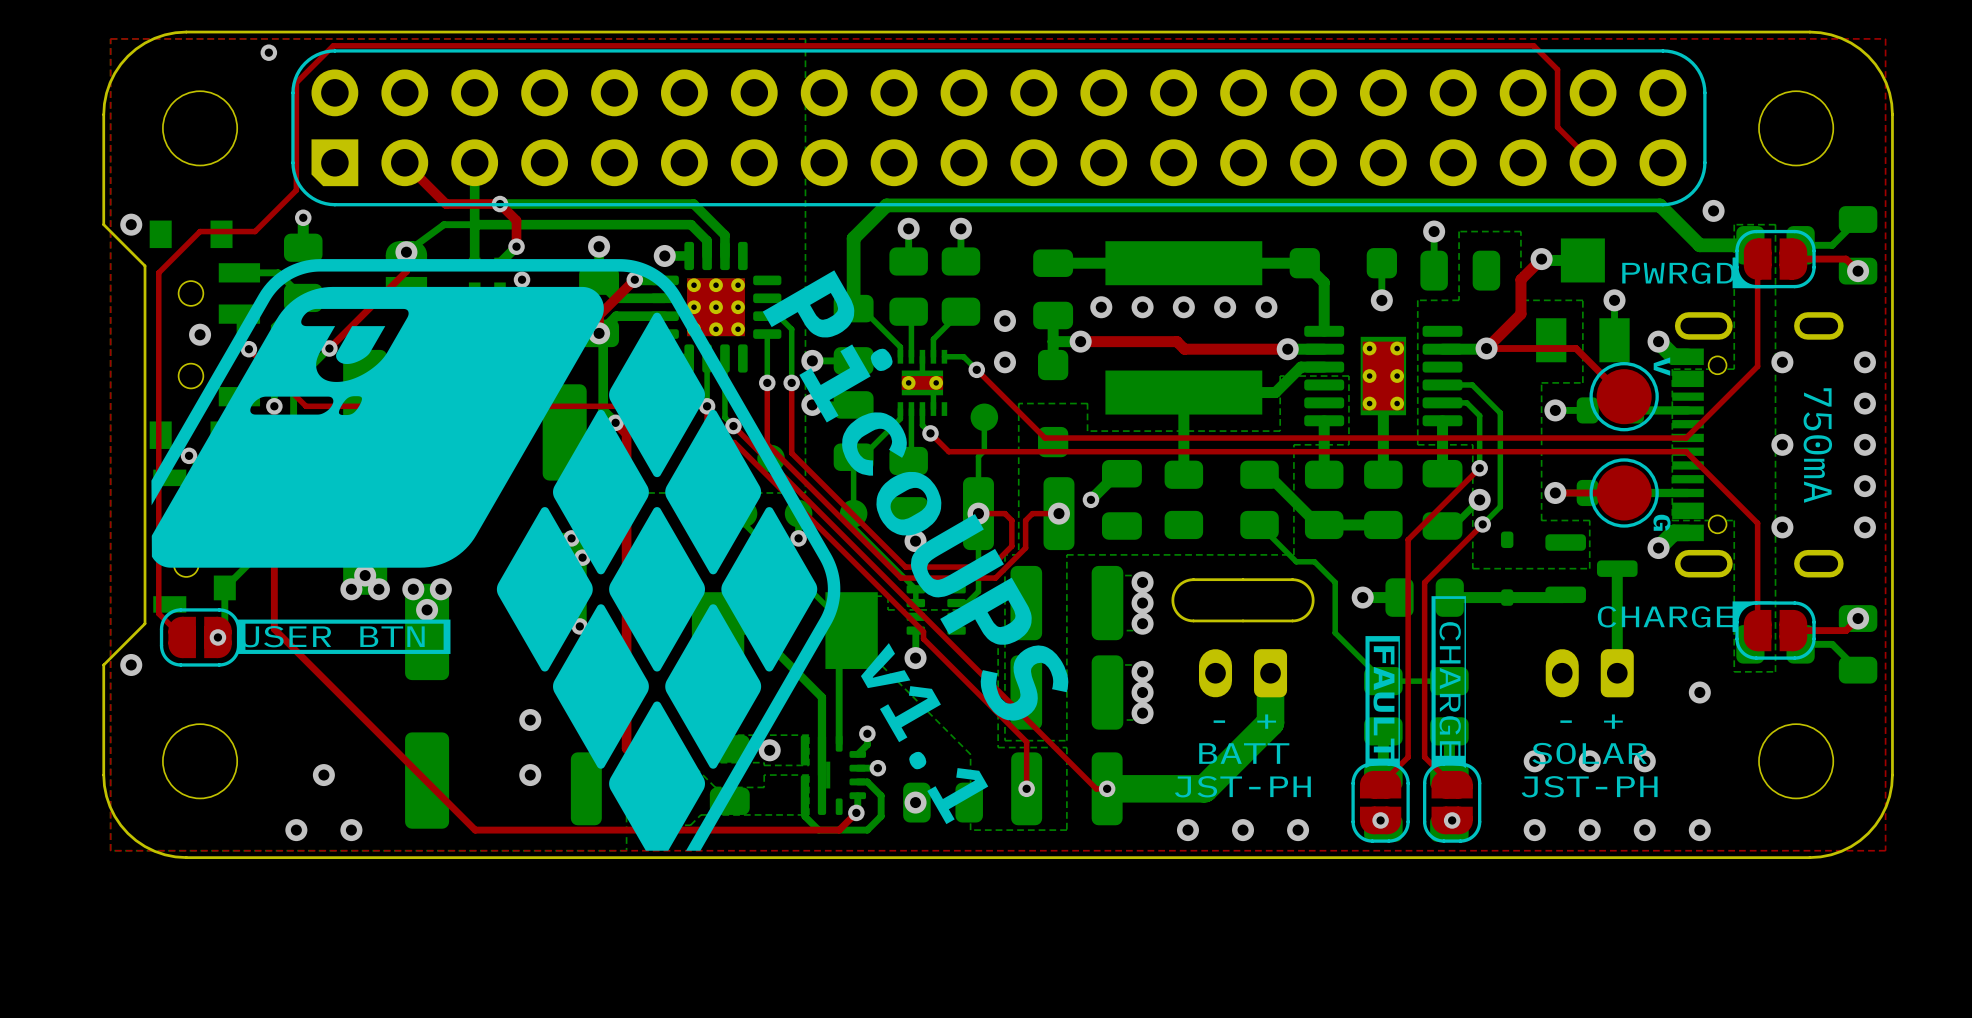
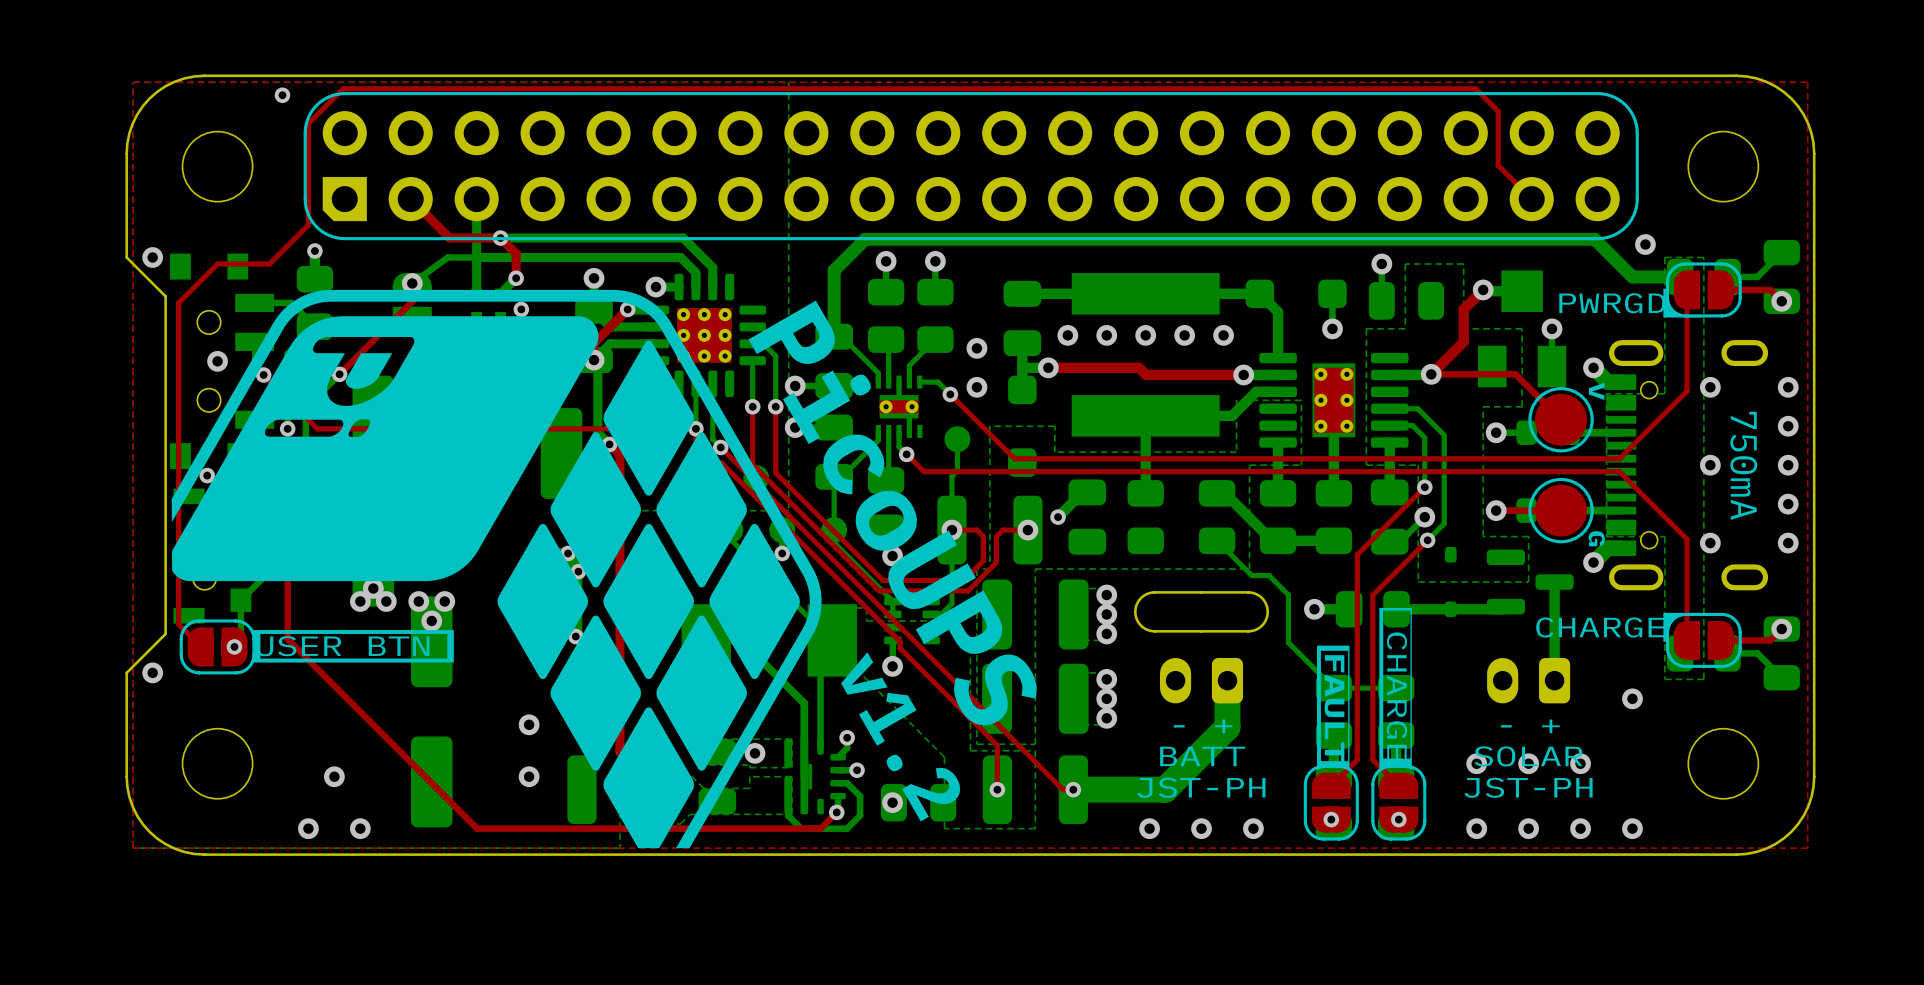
text: v1.1 (924, 733) -> v1.2 (900, 736)

